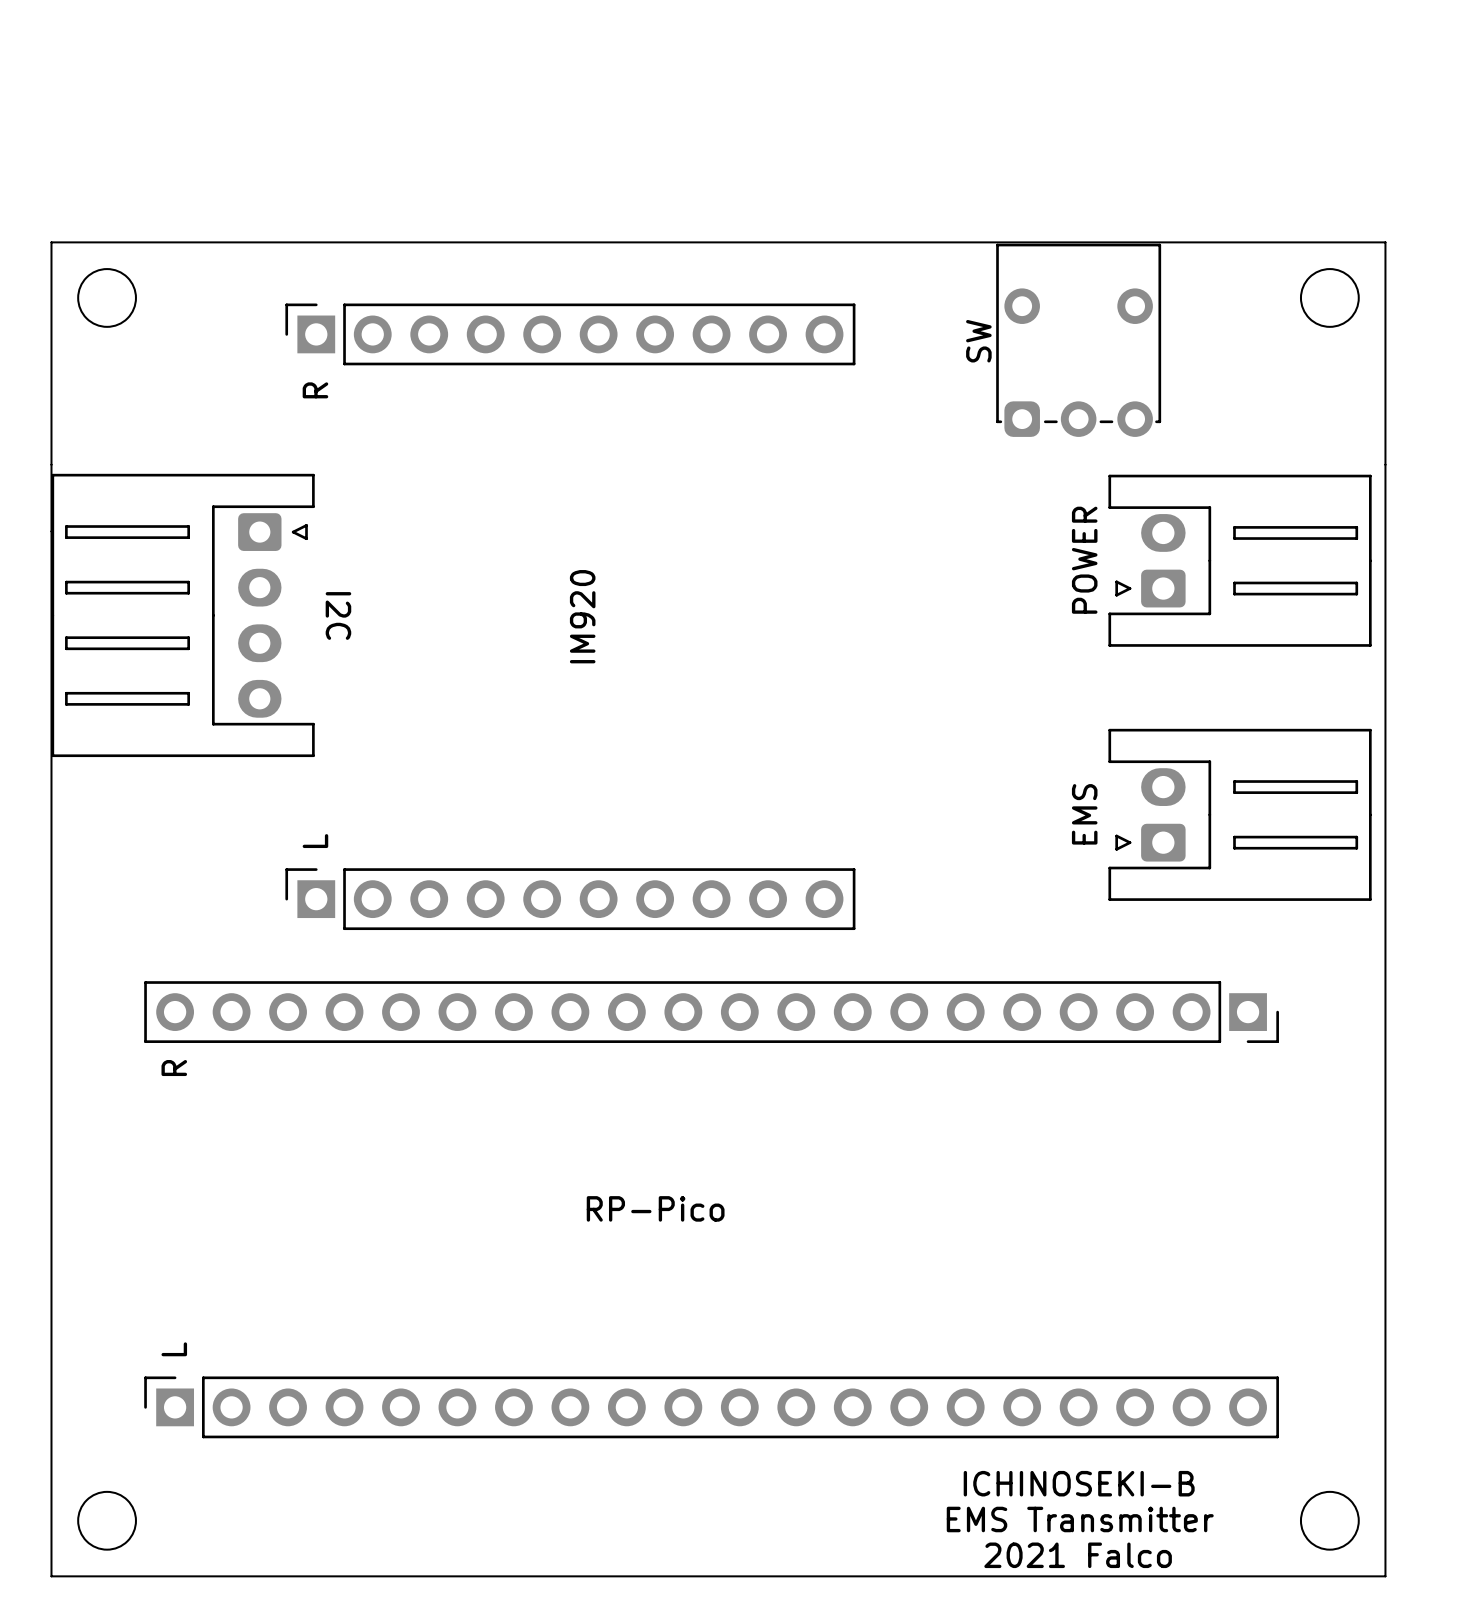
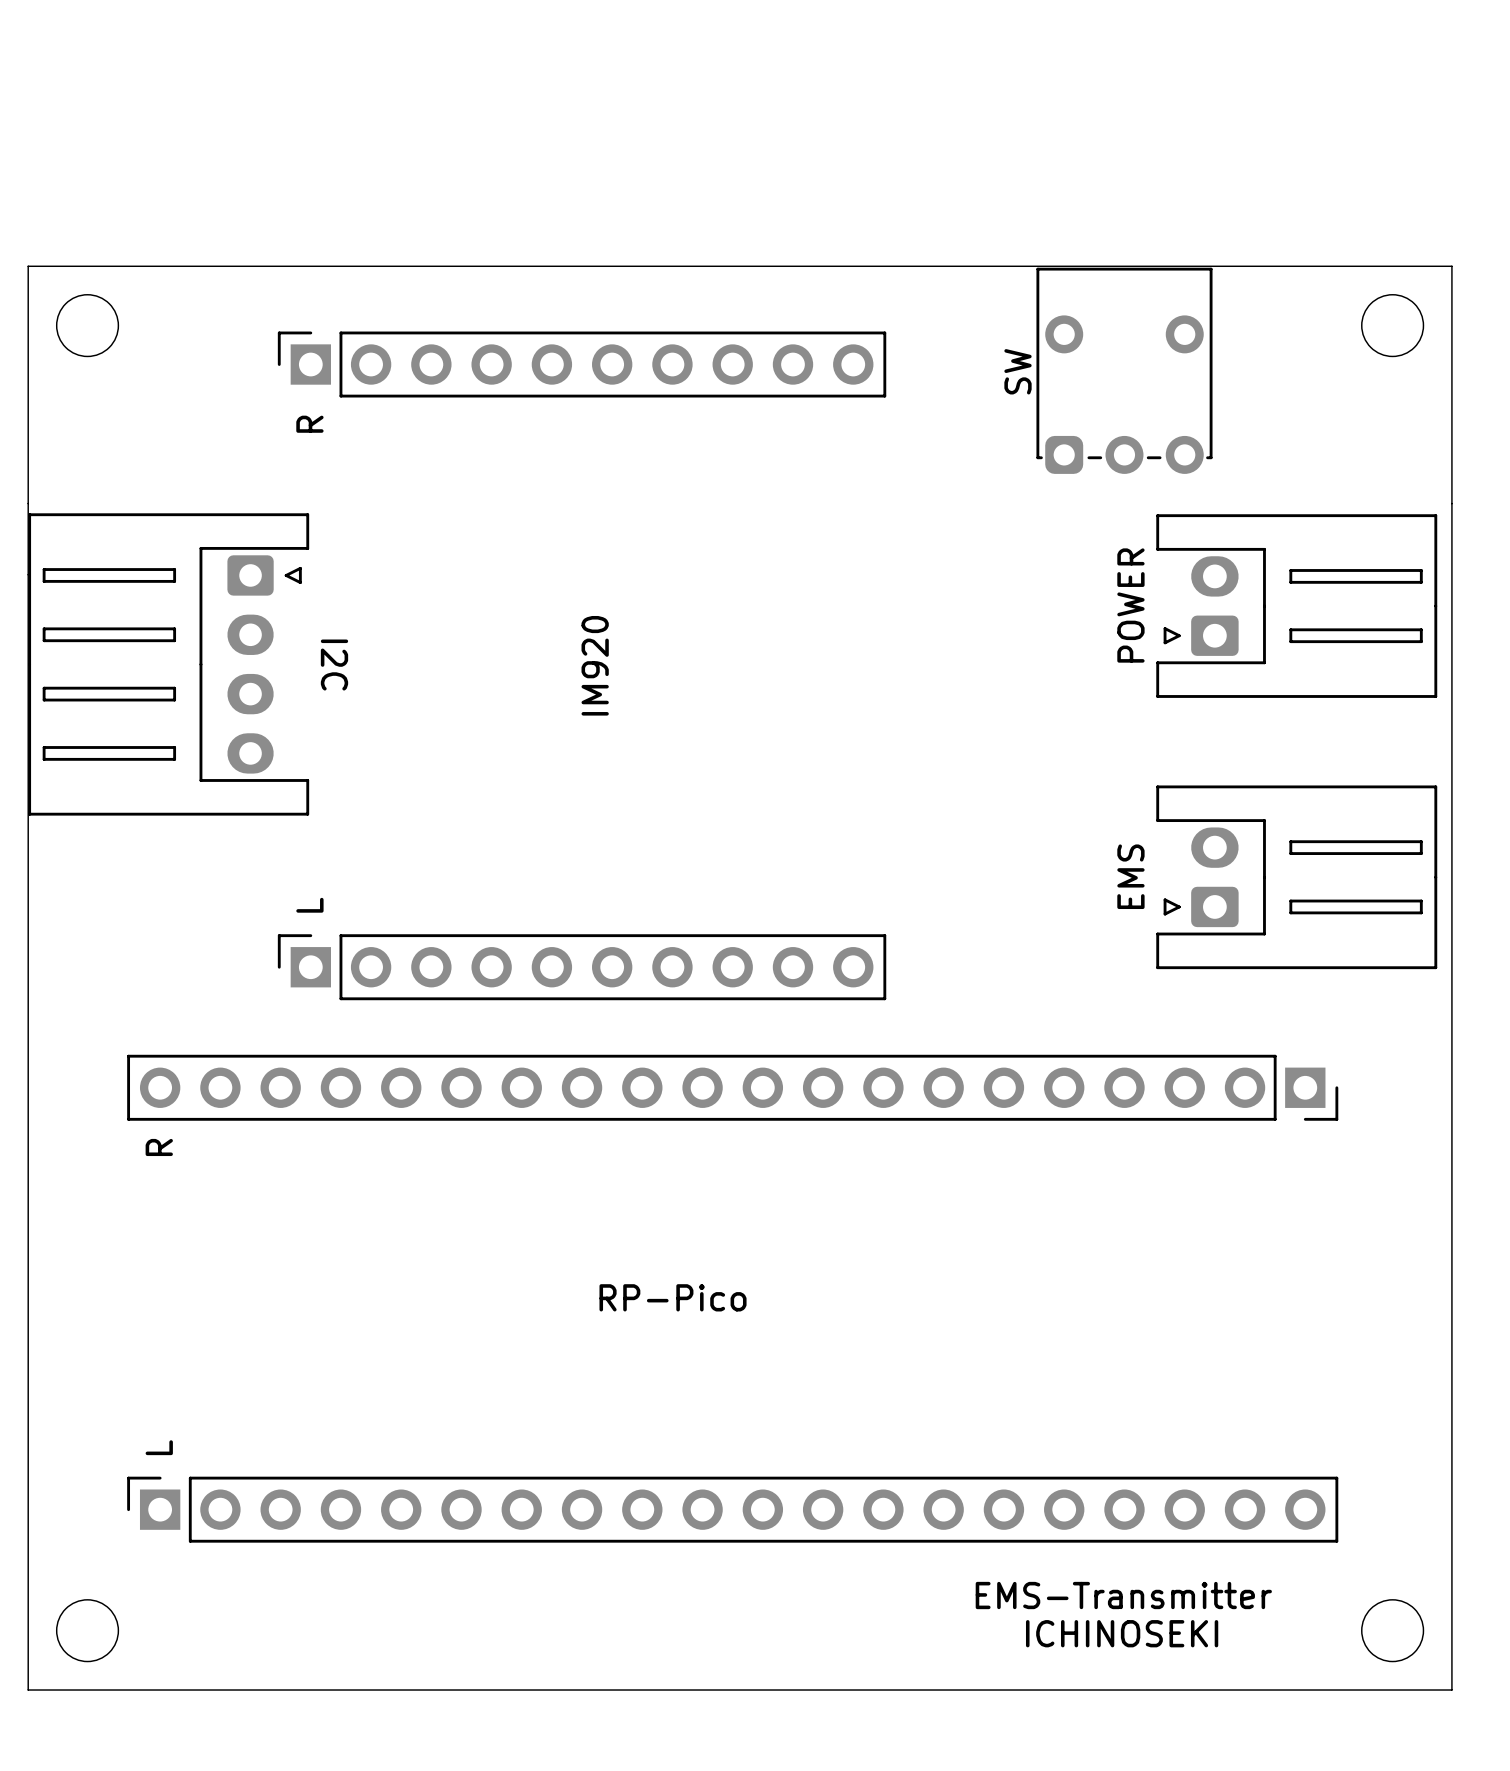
text: ICHINOSEKI-B (1079, 1483) -> EMS-Transmitter (1123, 1595)
text: EMS Transmitter (1080, 1519) -> ICHINOSEKI (1122, 1633)
text: 2021 Falco (1078, 1555) -> none

